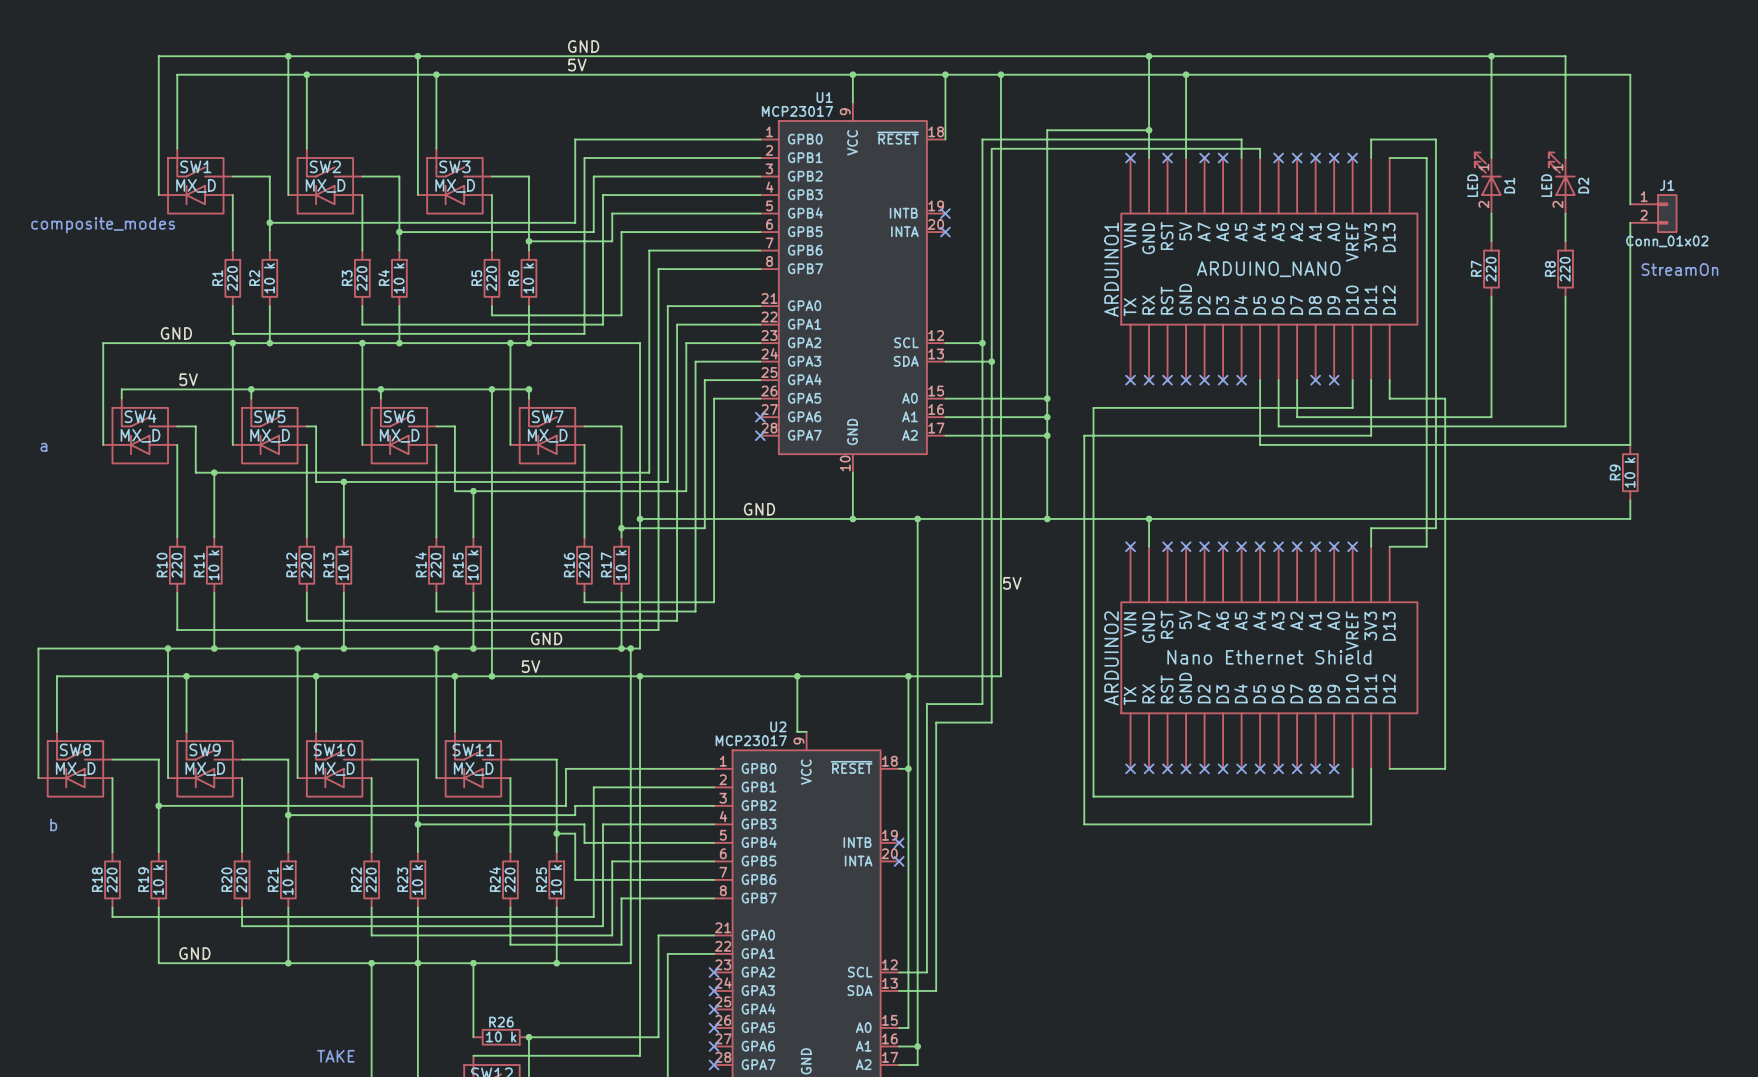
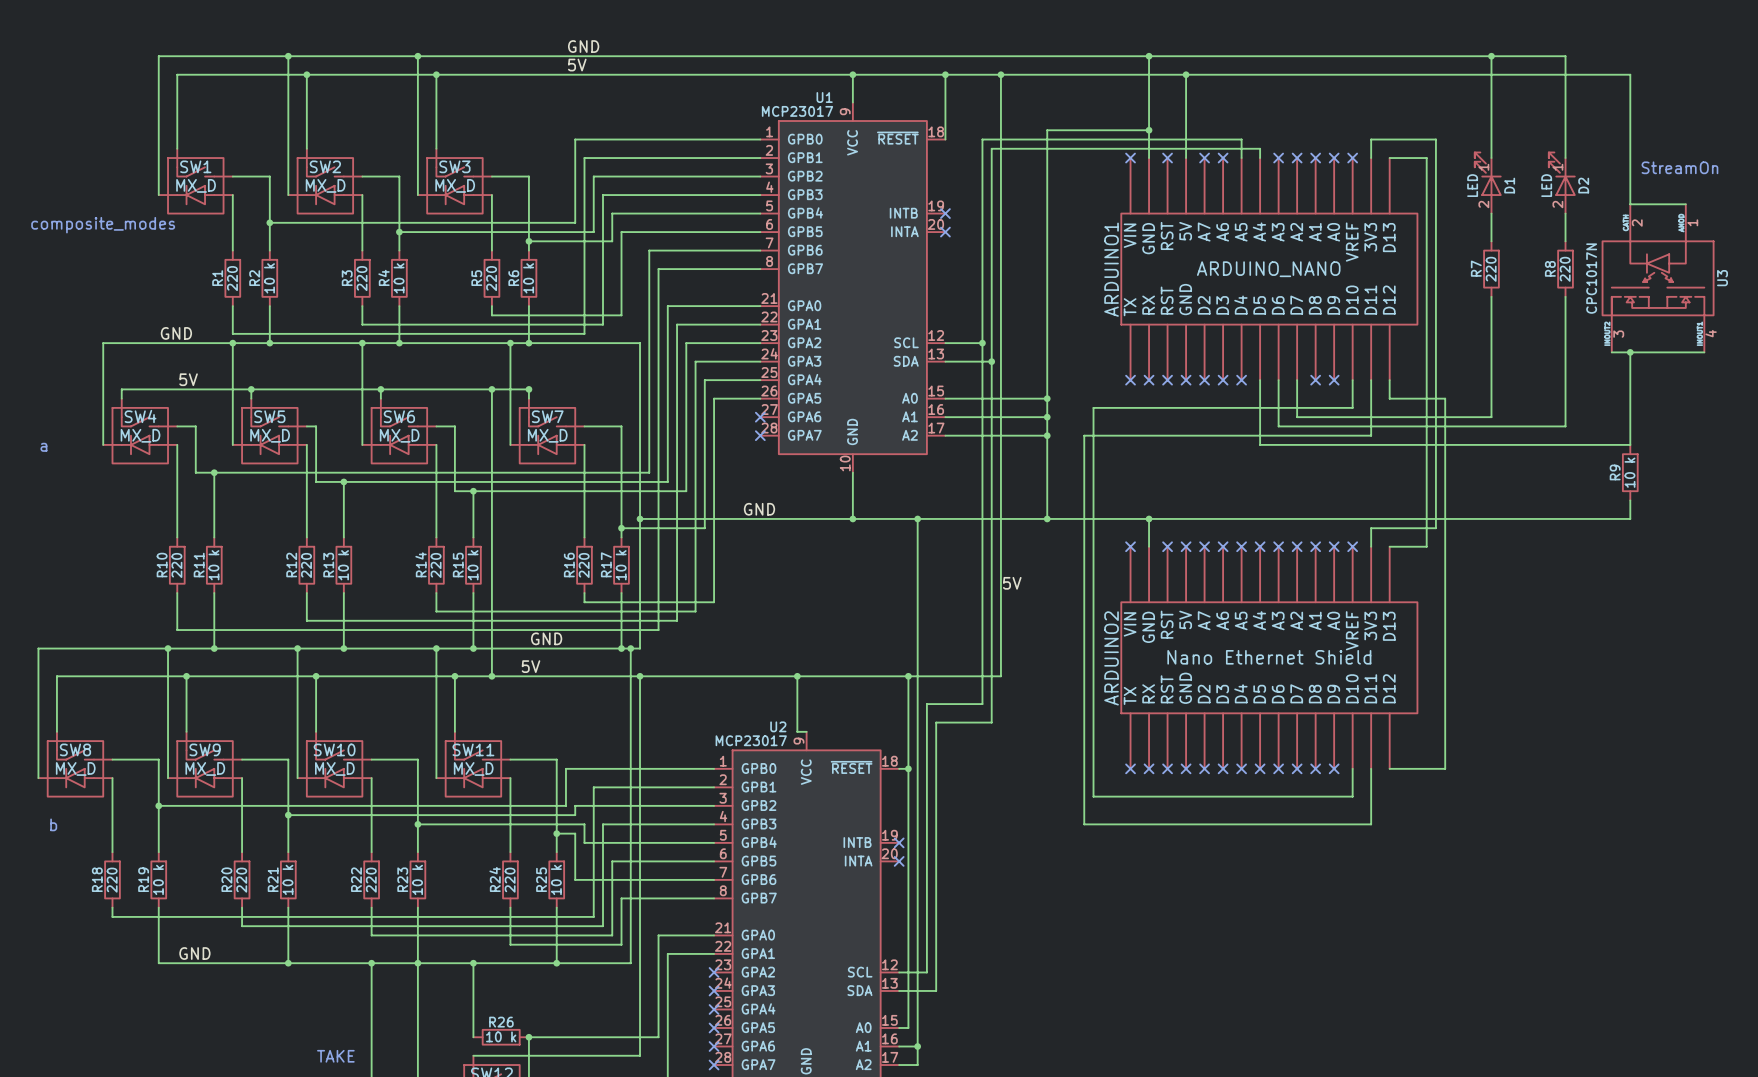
J1: Conn_01x02 (1653, 213) -> none
wire: (1630, 222) (1630, 352) -> none
text position: StreamOn (1679, 269) -> StreamOn (1679, 167)
U3: none -> CPC1017N (1658, 278)
wire: none -> (1611, 352) (1704, 352)
junction: none -> (1630, 352)

